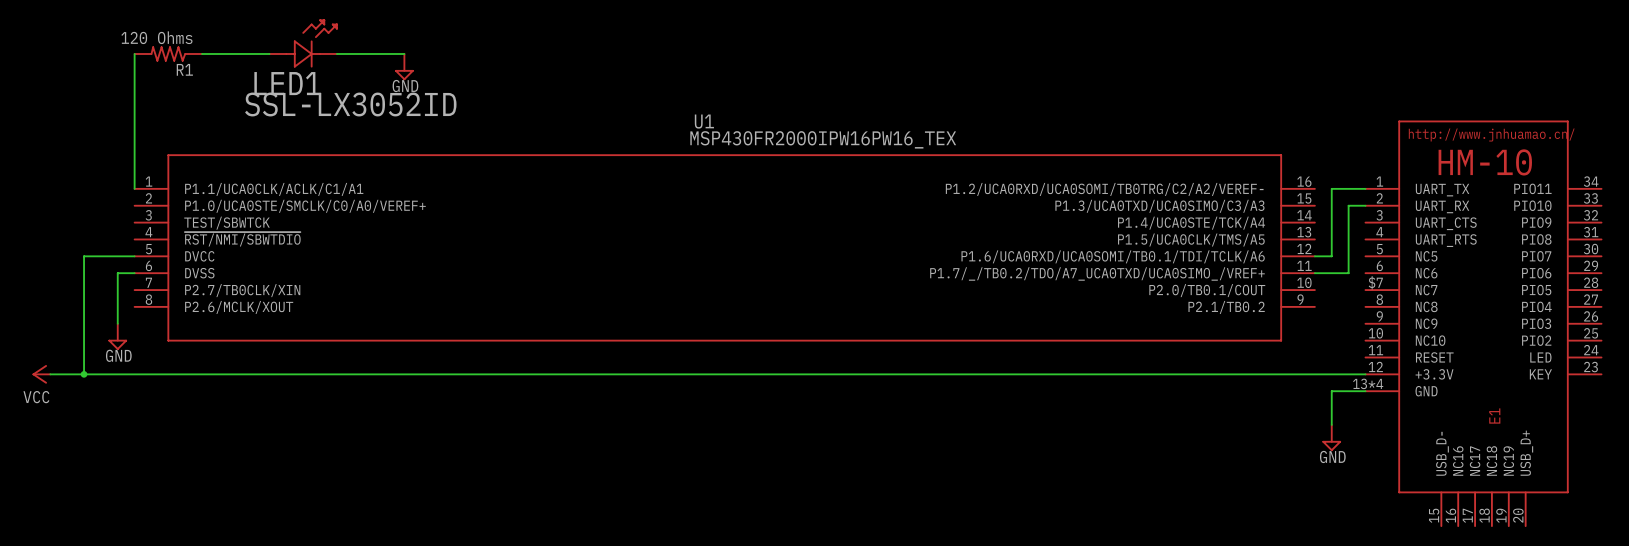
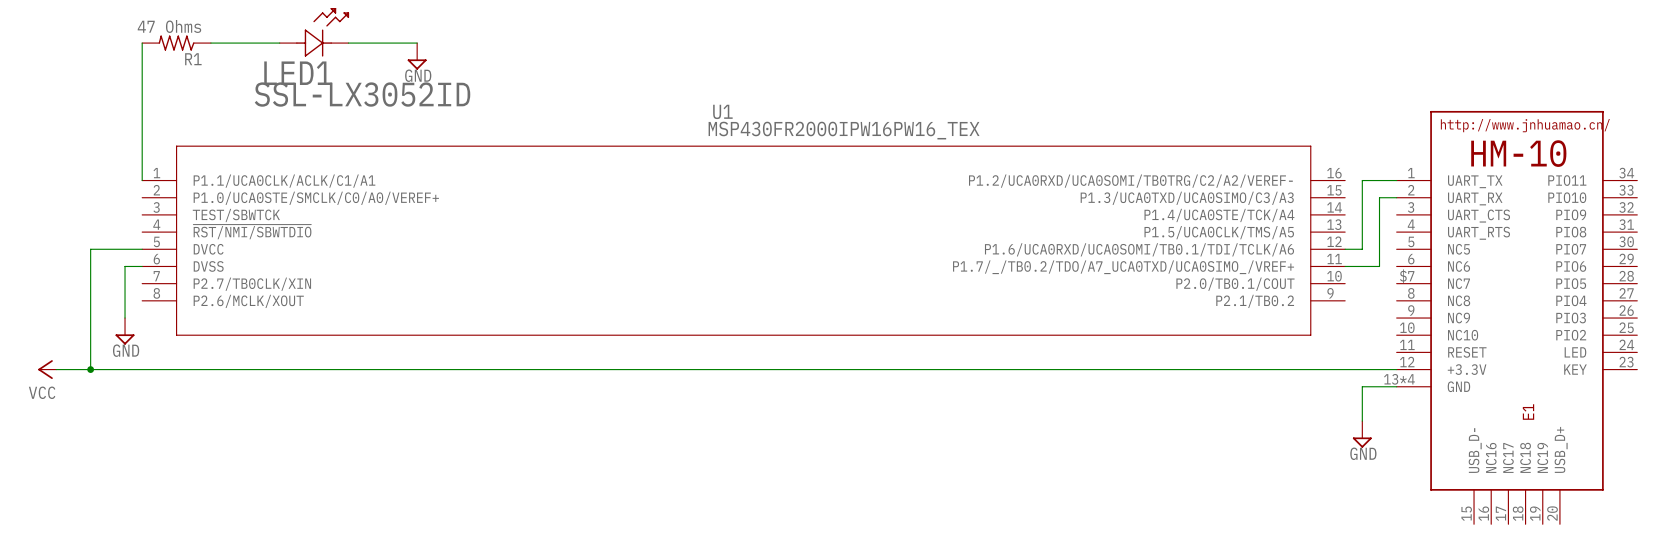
R1 value: 120 Ohms (156, 37) -> 47 Ohms (169, 26)

